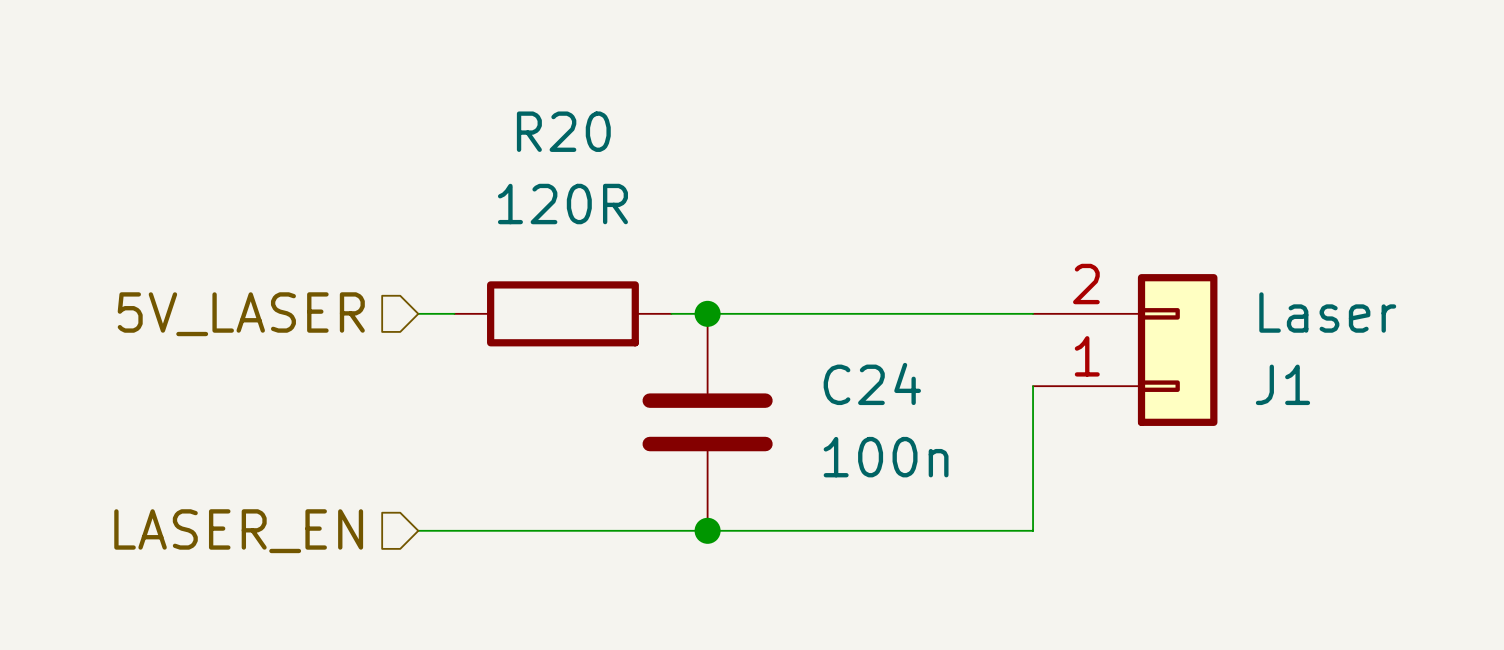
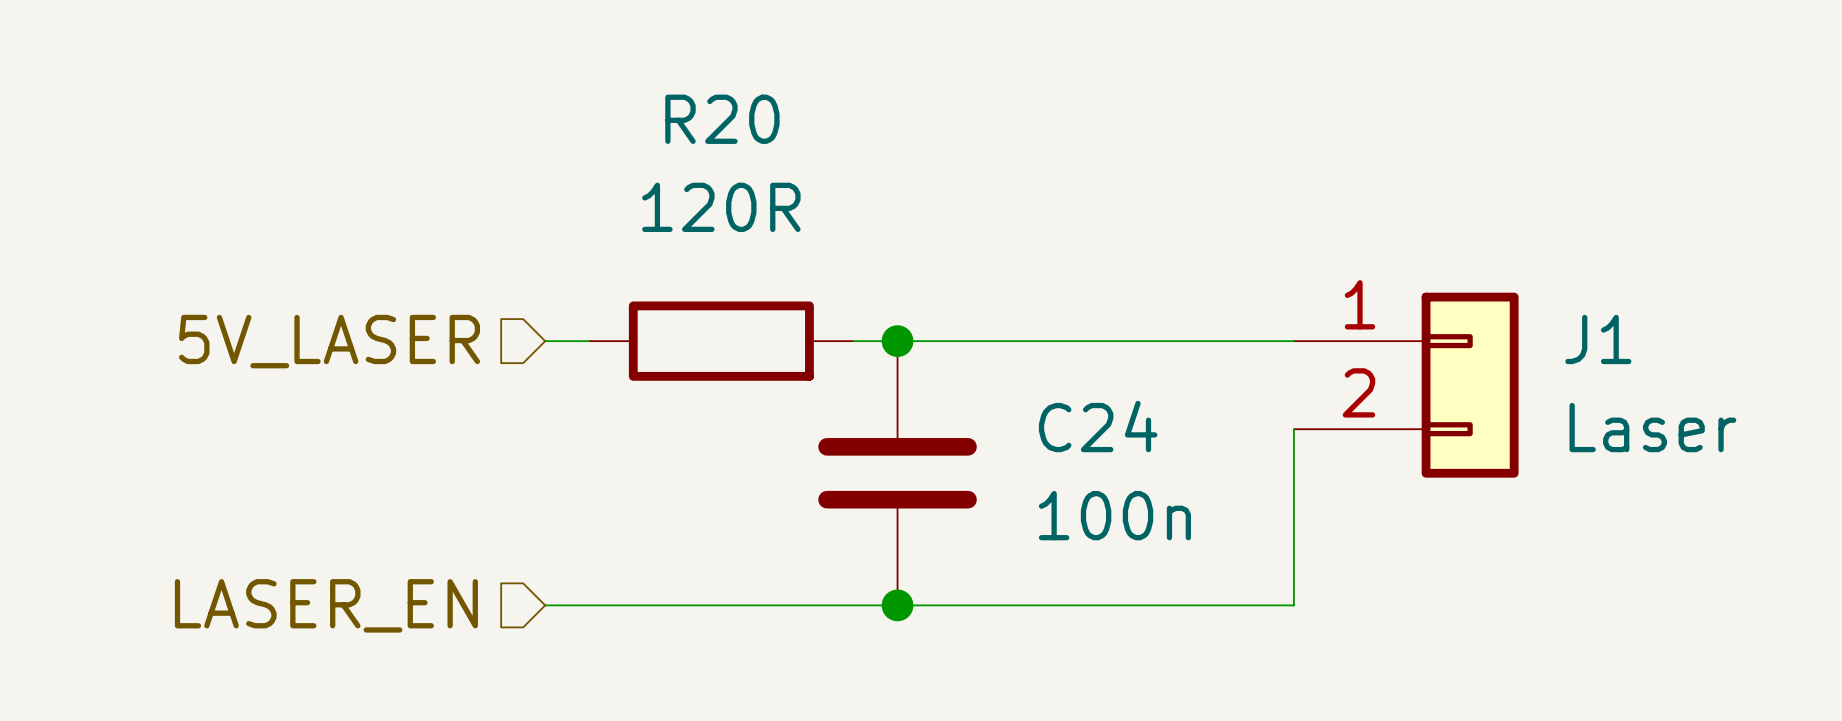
J1 flip: as is (1177, 350) -> up-down (1470, 385)

